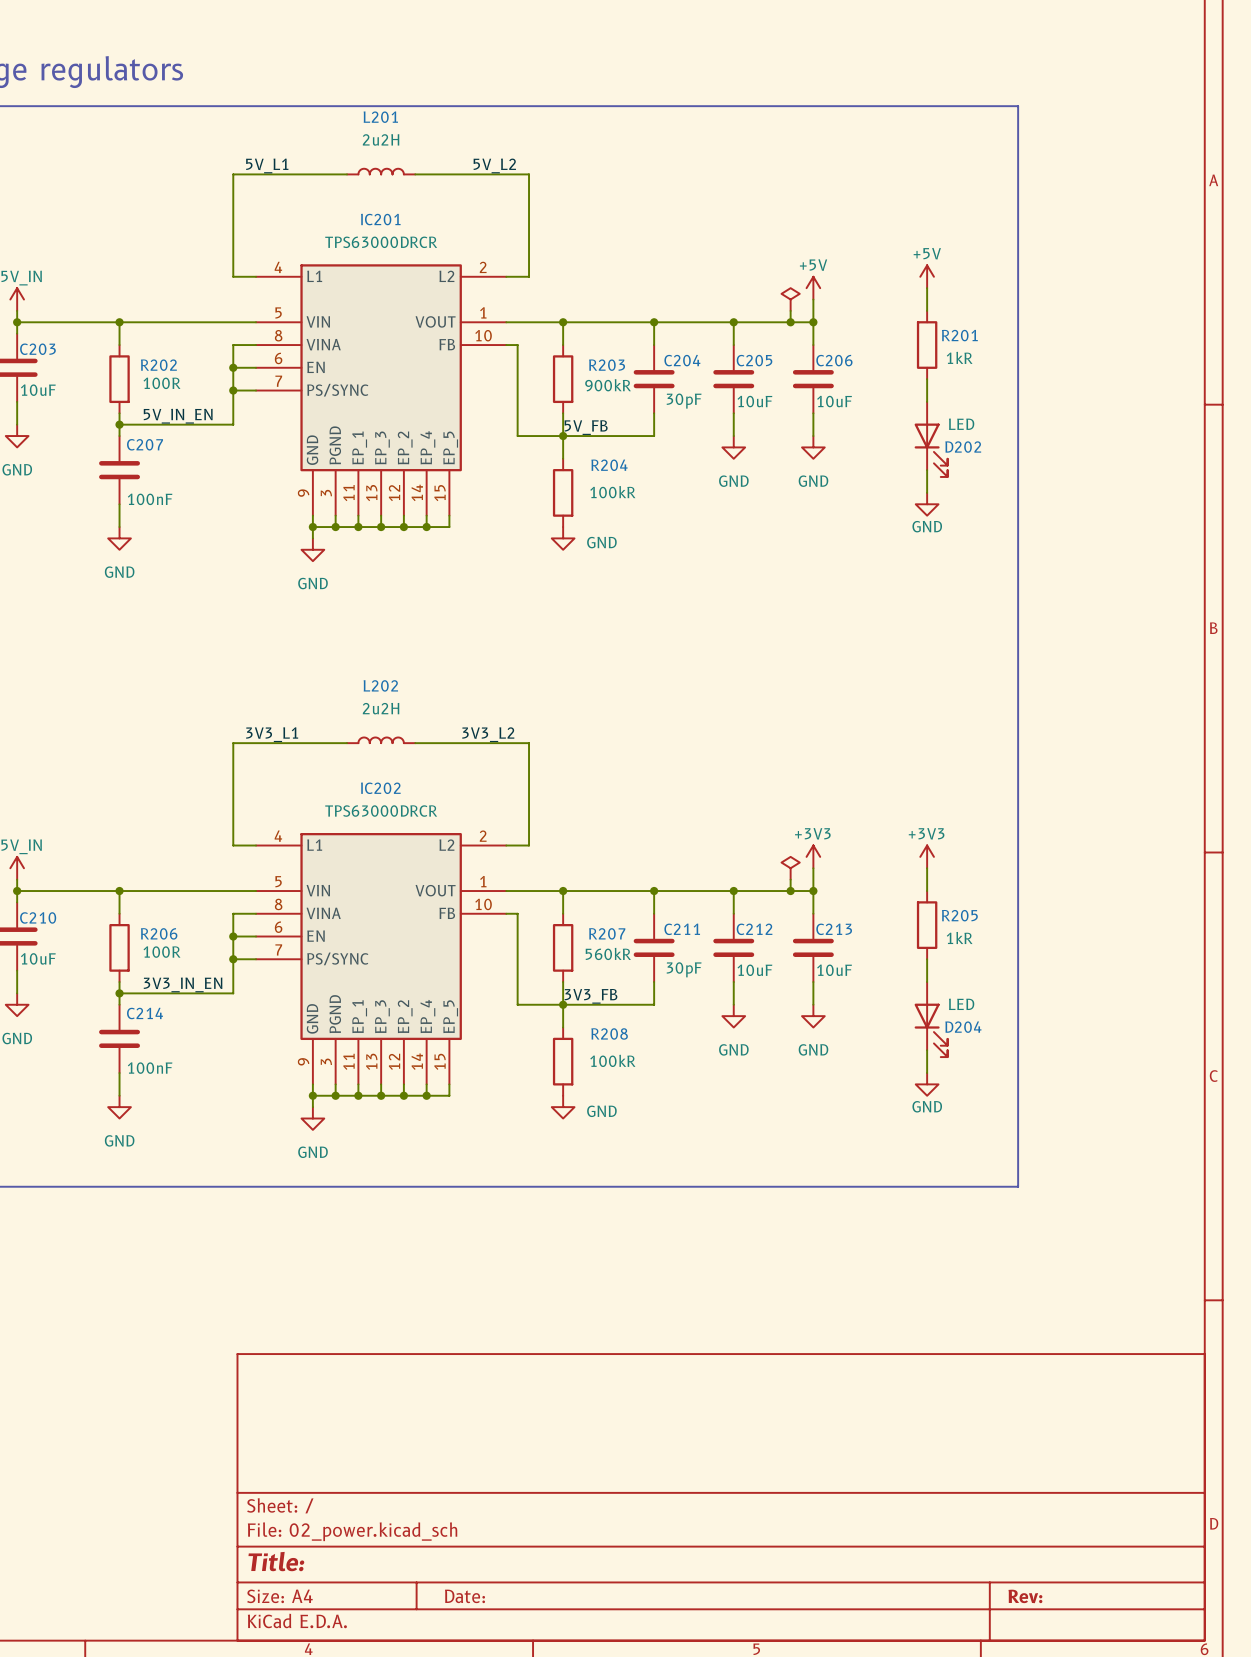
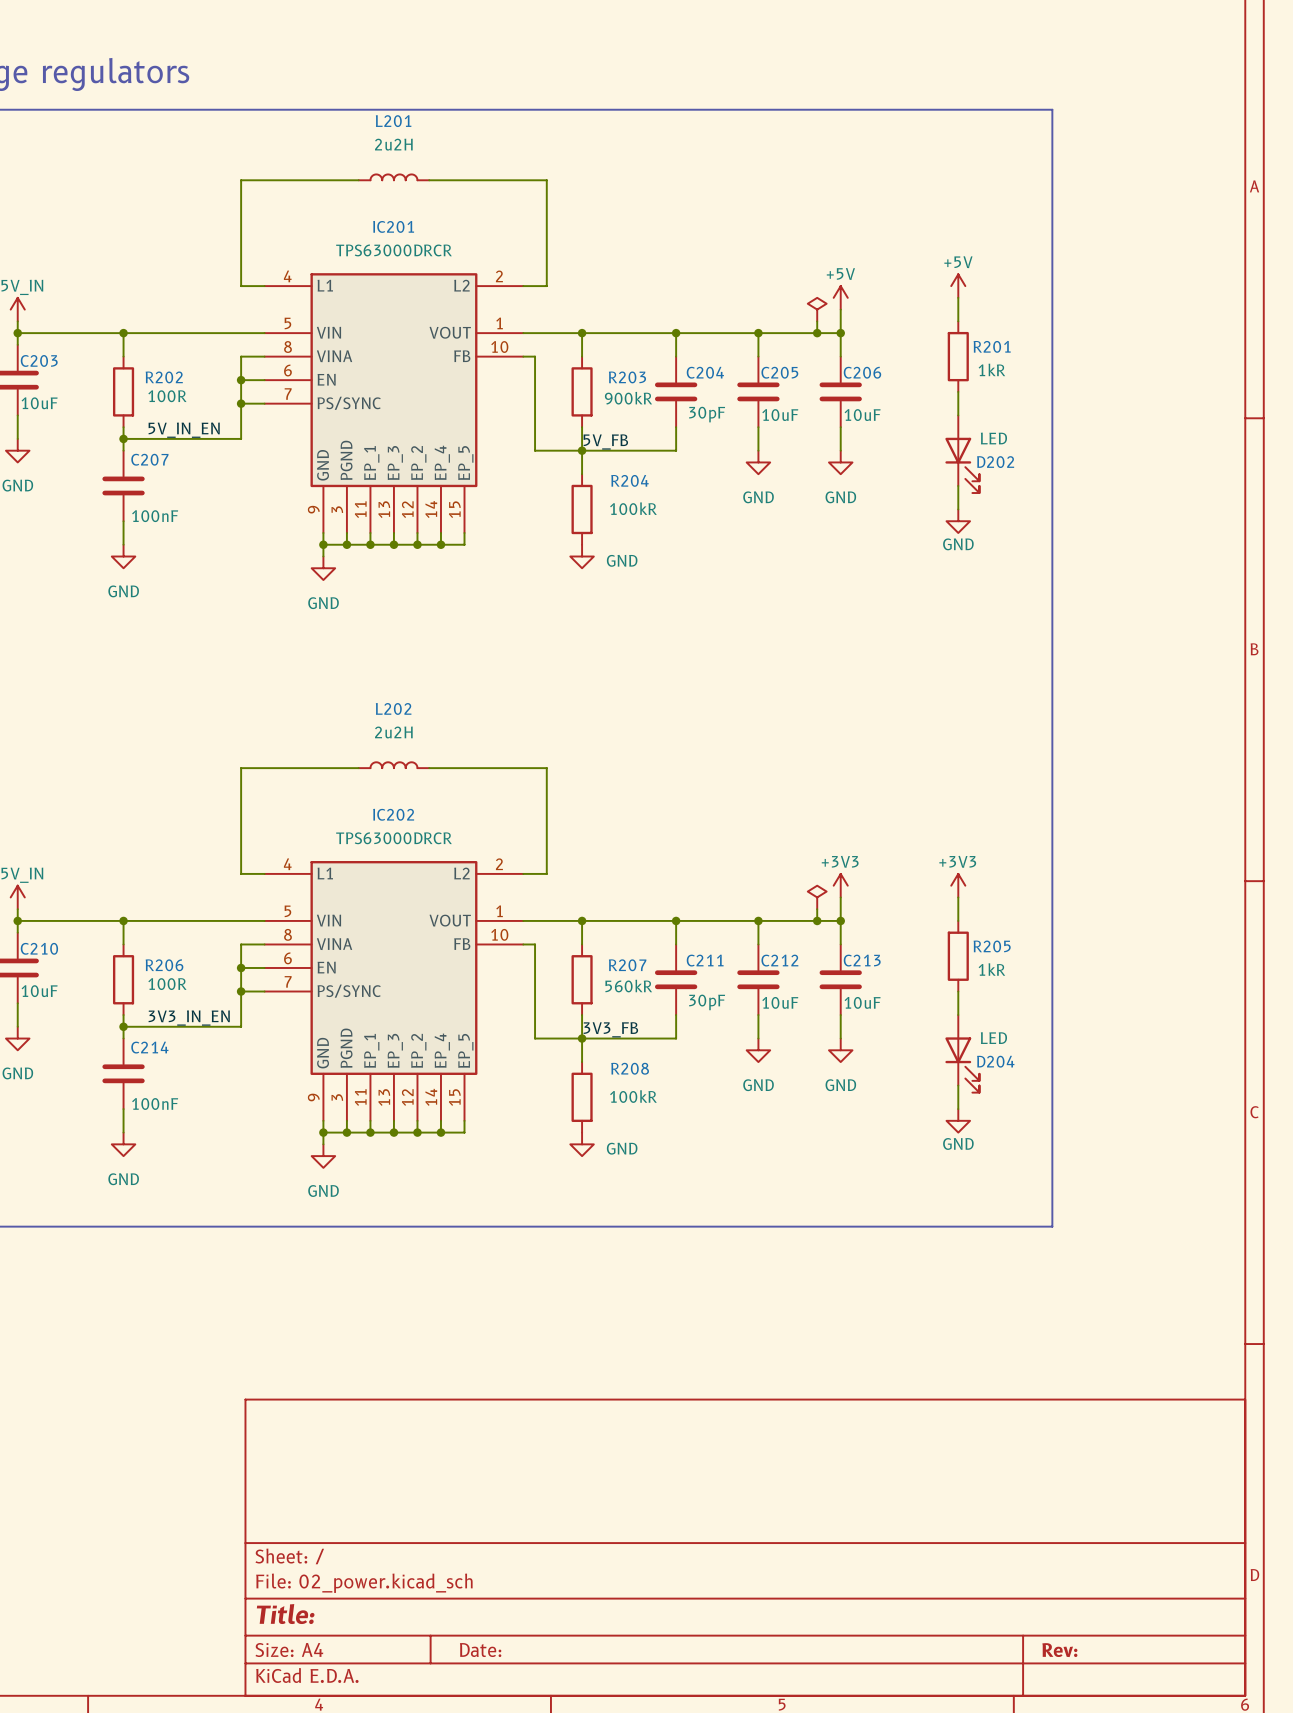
label: 5V_L1 (267, 165) -> none
label: 5V_L2 (494, 165) -> none
label: 3V3_L1 (272, 734) -> none
label: 3V3_L2 (488, 734) -> none

